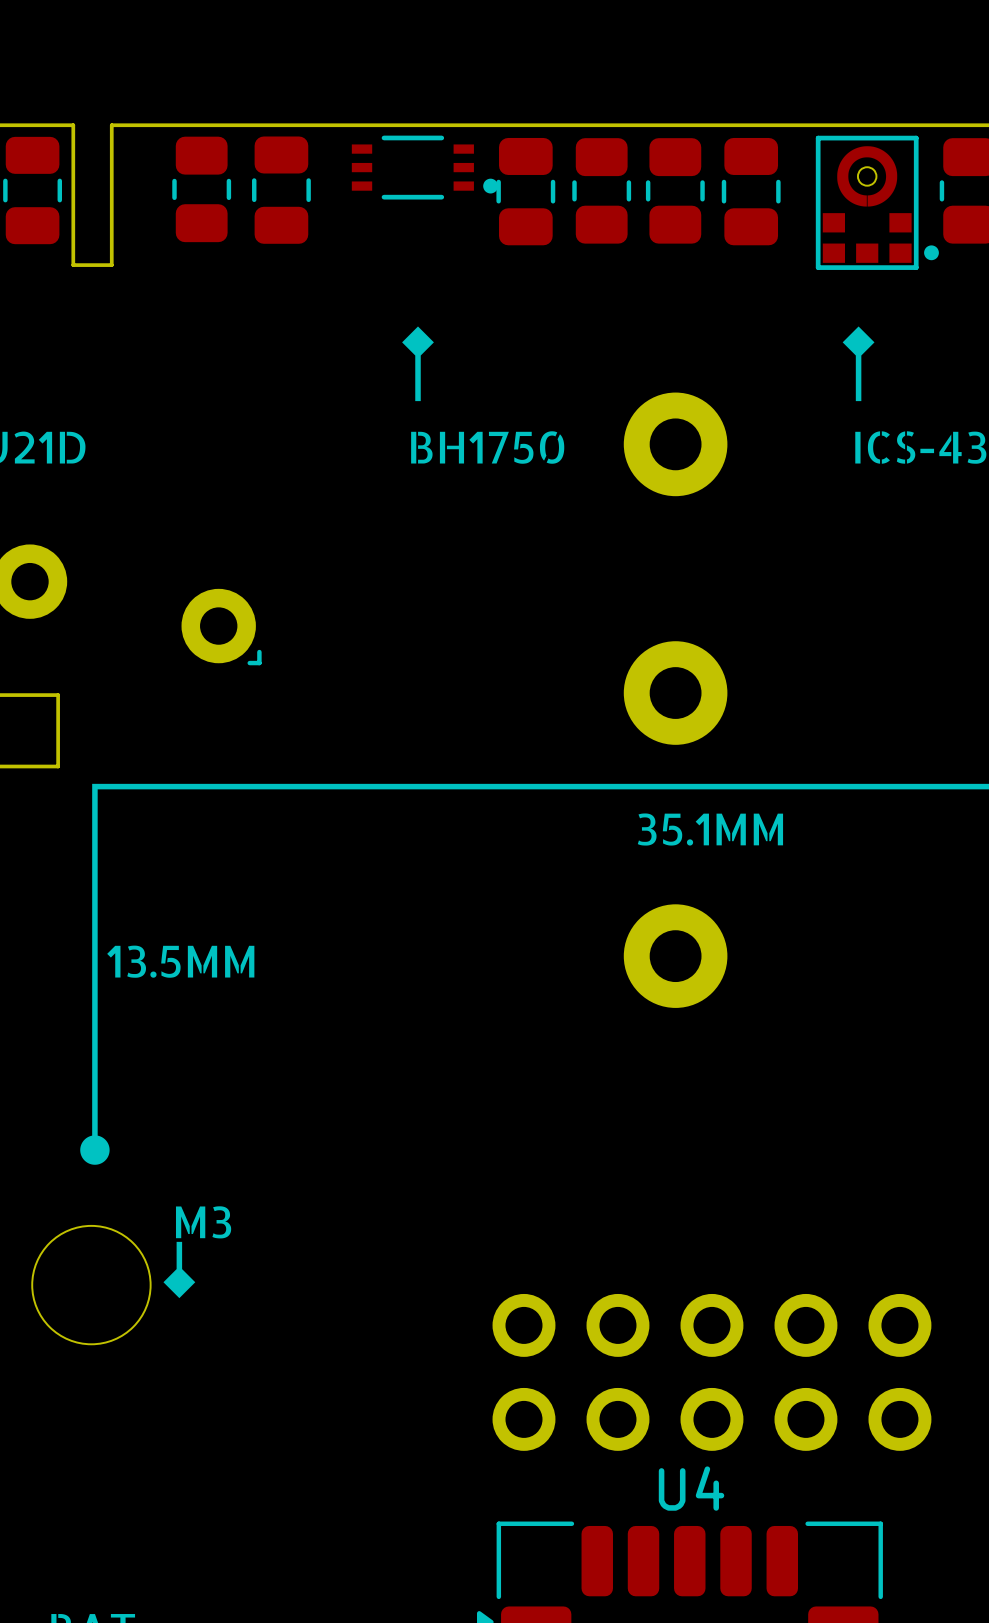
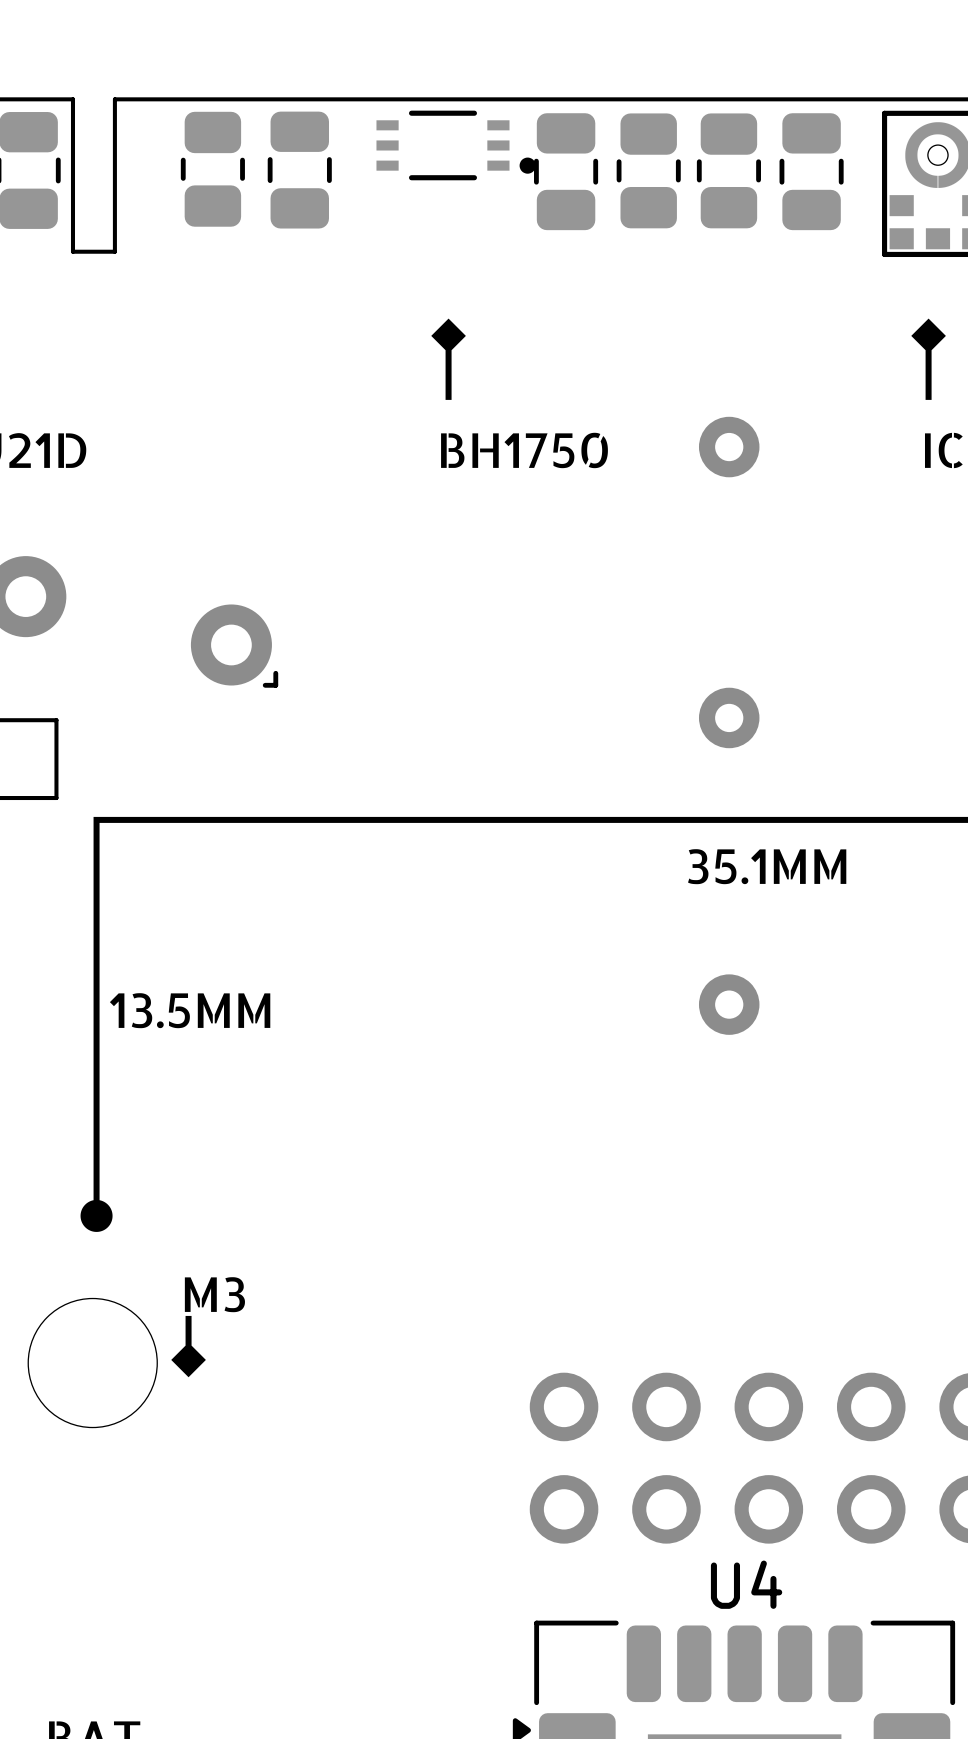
part footprint: [623, 392, 728, 497] -> [698, 416, 760, 478]
part footprint: [623, 641, 728, 745] -> [698, 687, 760, 749]
part footprint: [623, 904, 728, 1008] -> [698, 974, 760, 1035]

